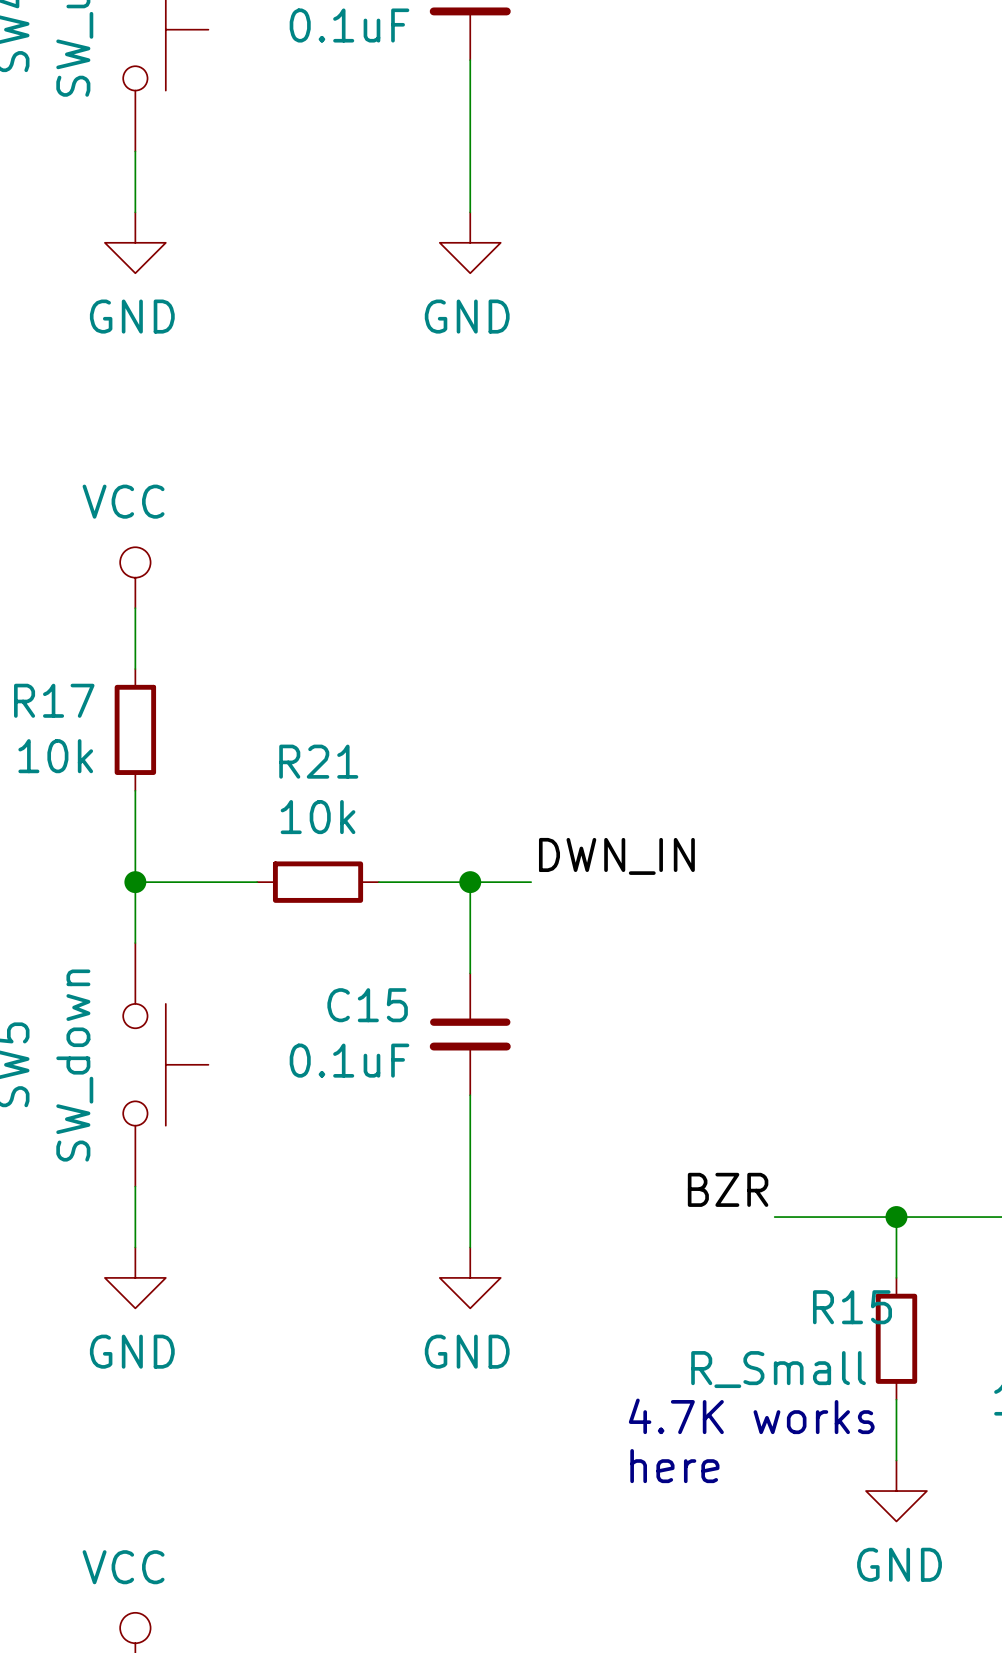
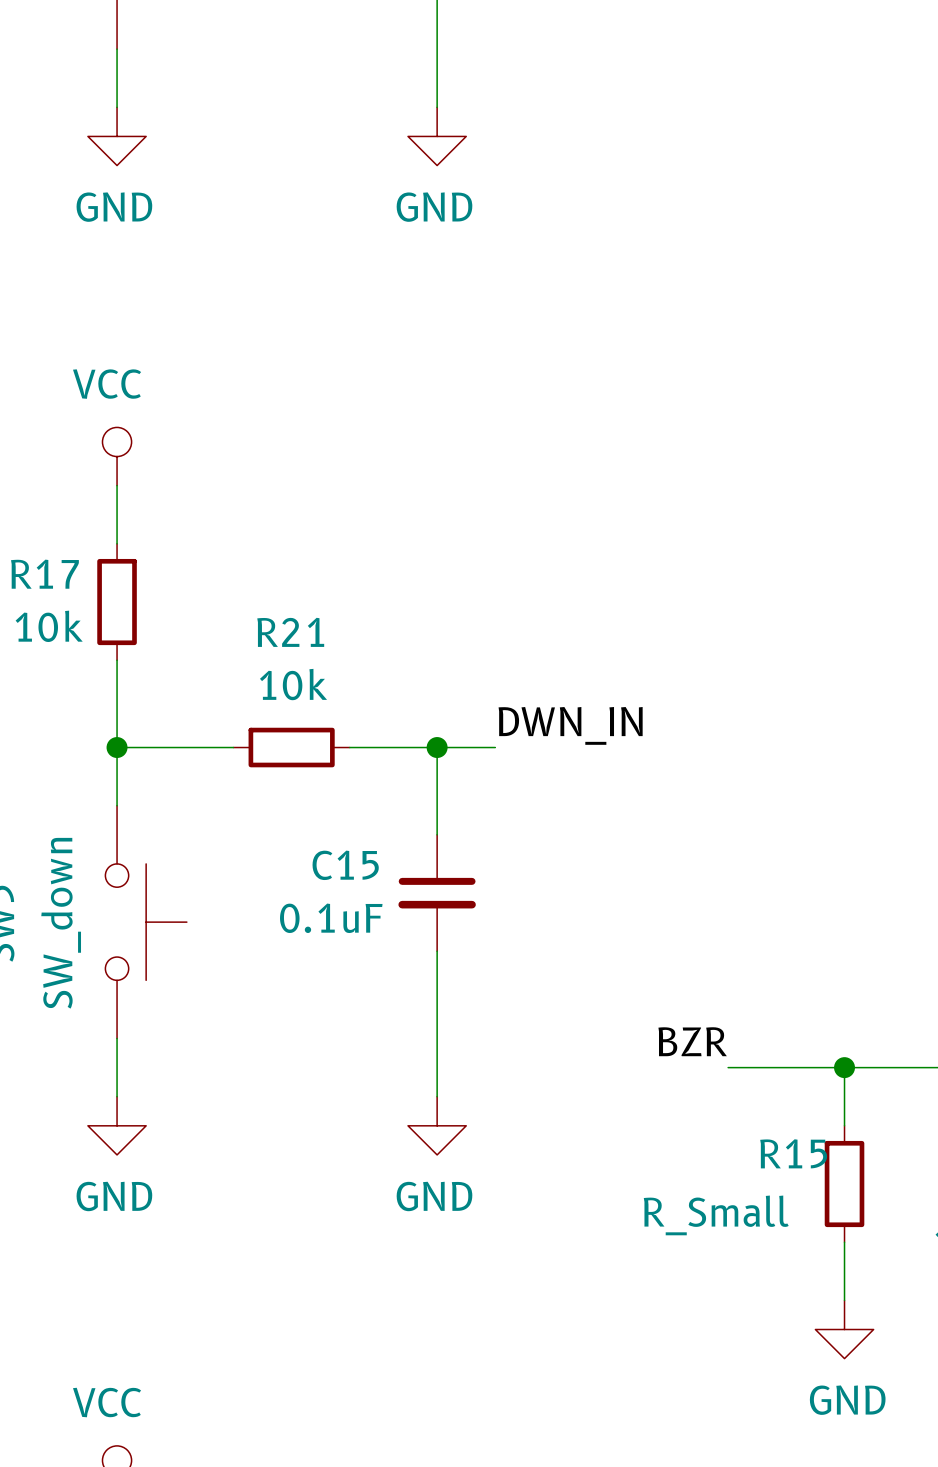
text: 4.7K works (751, 1416) -> none
text: here (674, 1466) -> none

